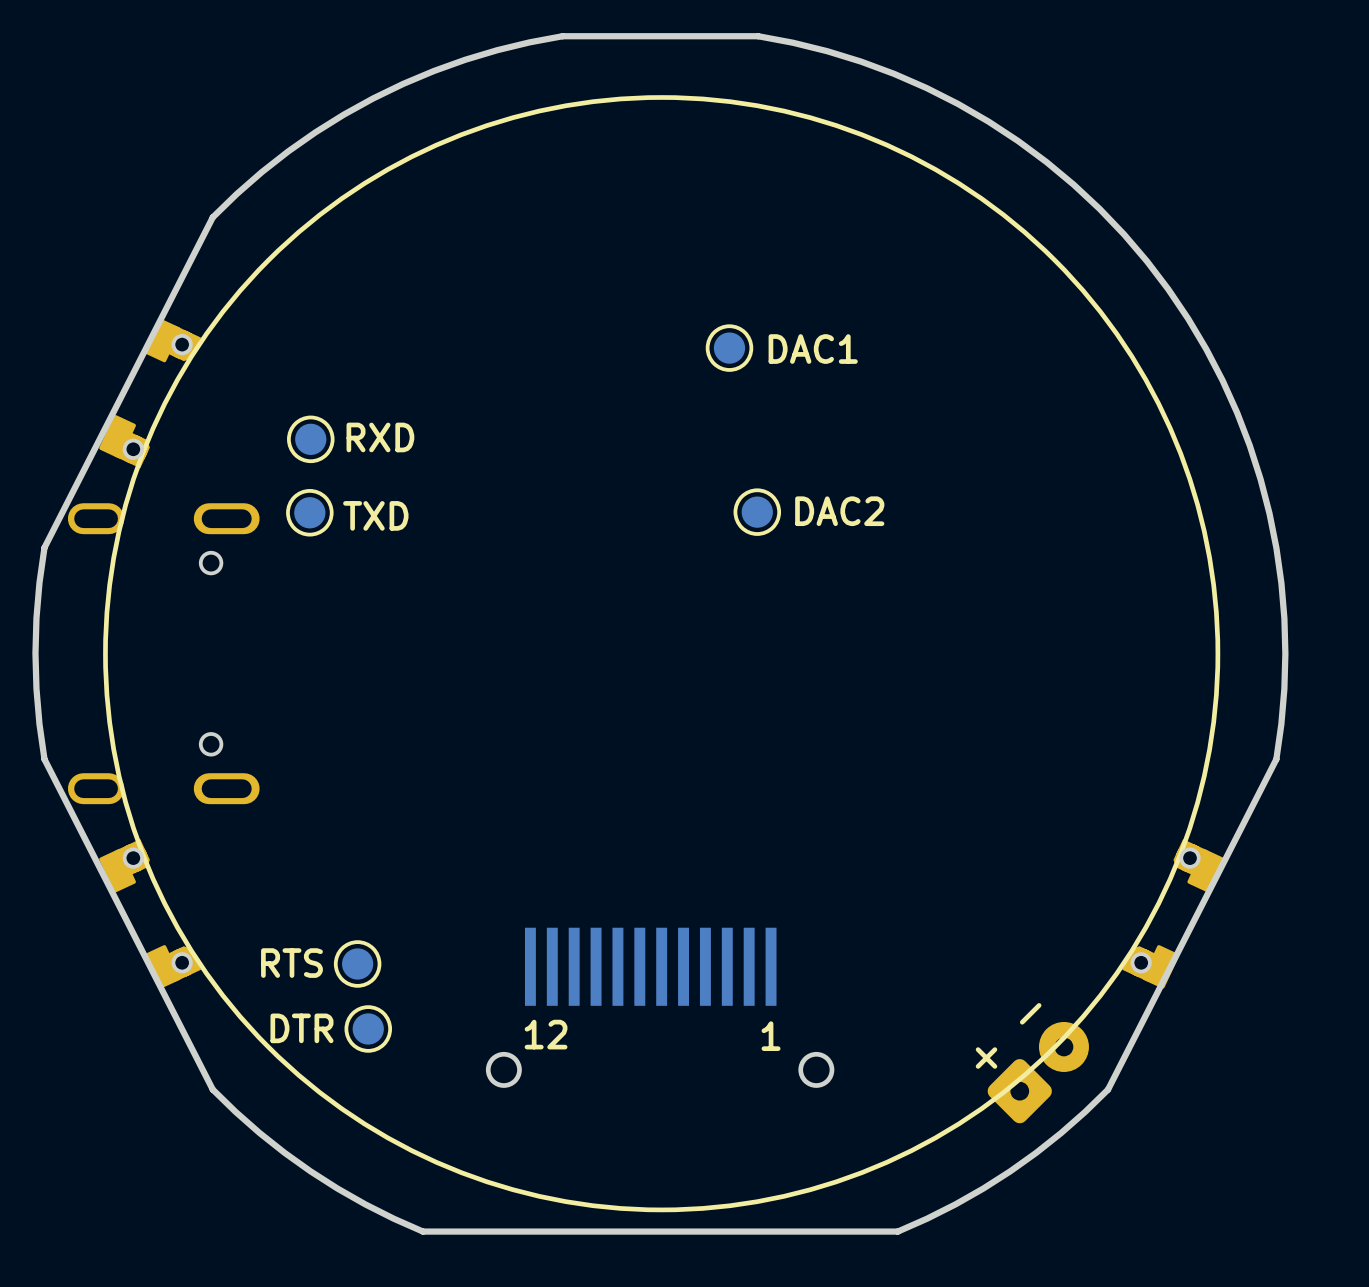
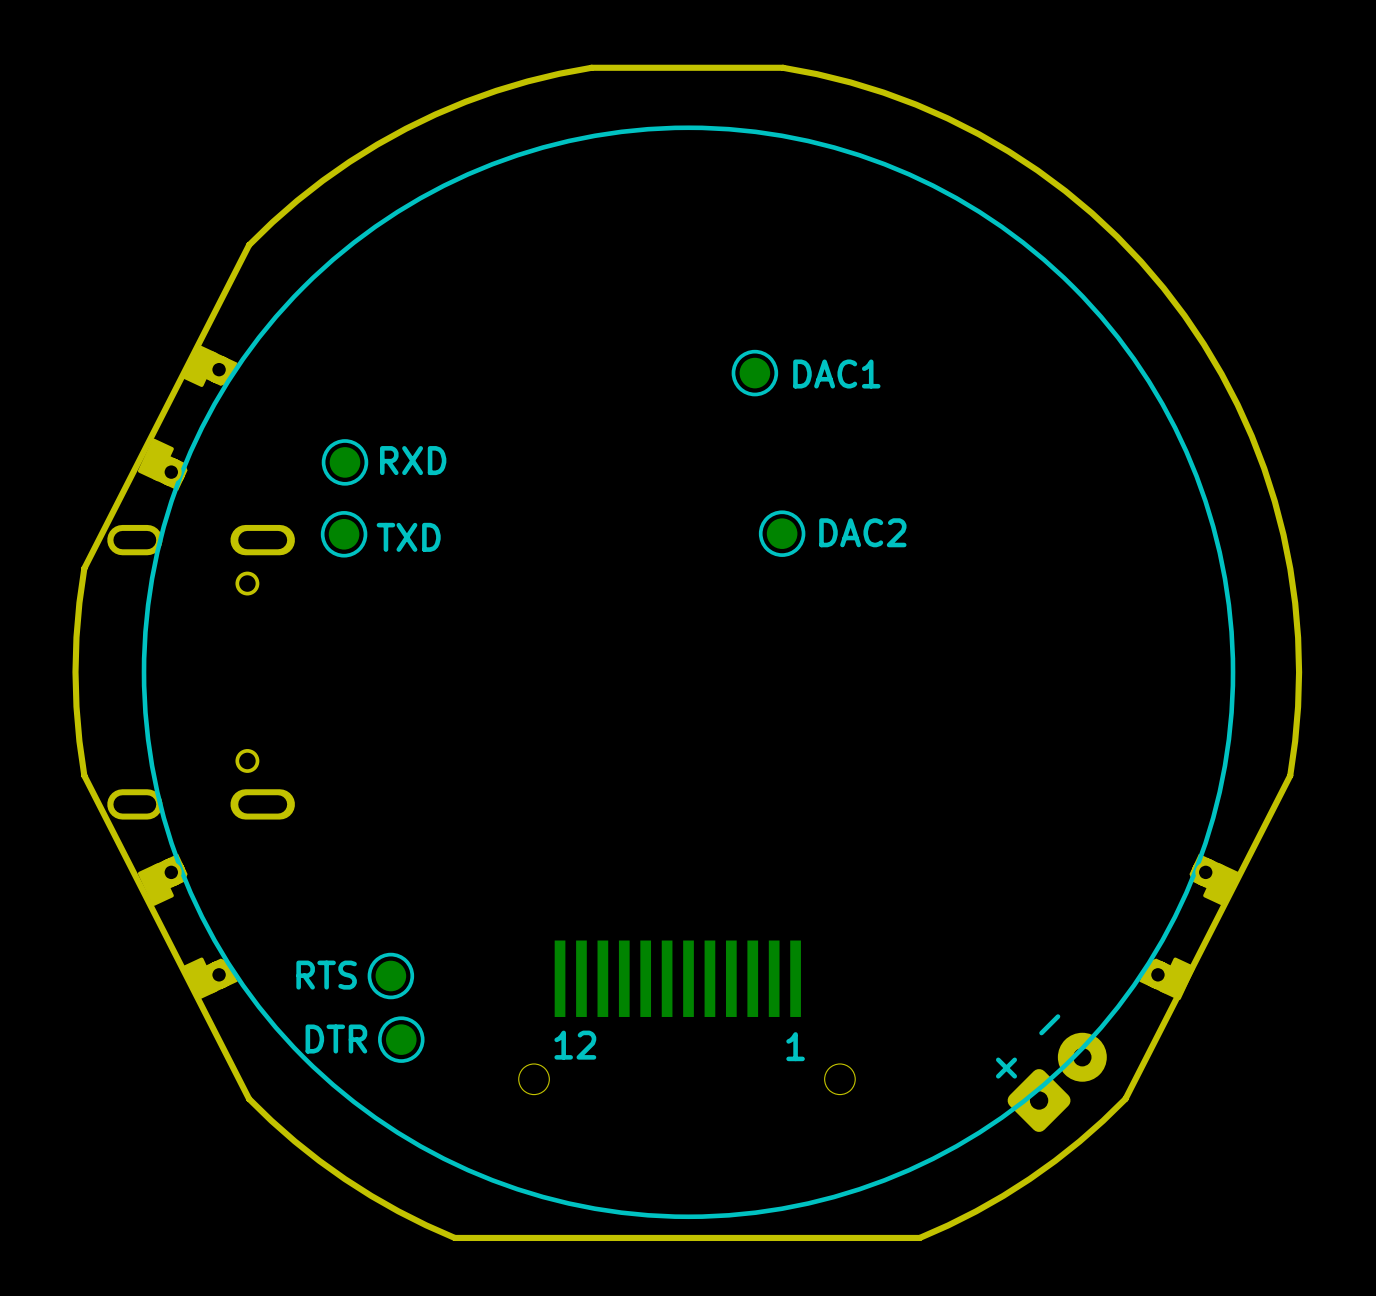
part footprint: [485, 927, 835, 1088] -> [518, 940, 856, 1095]

